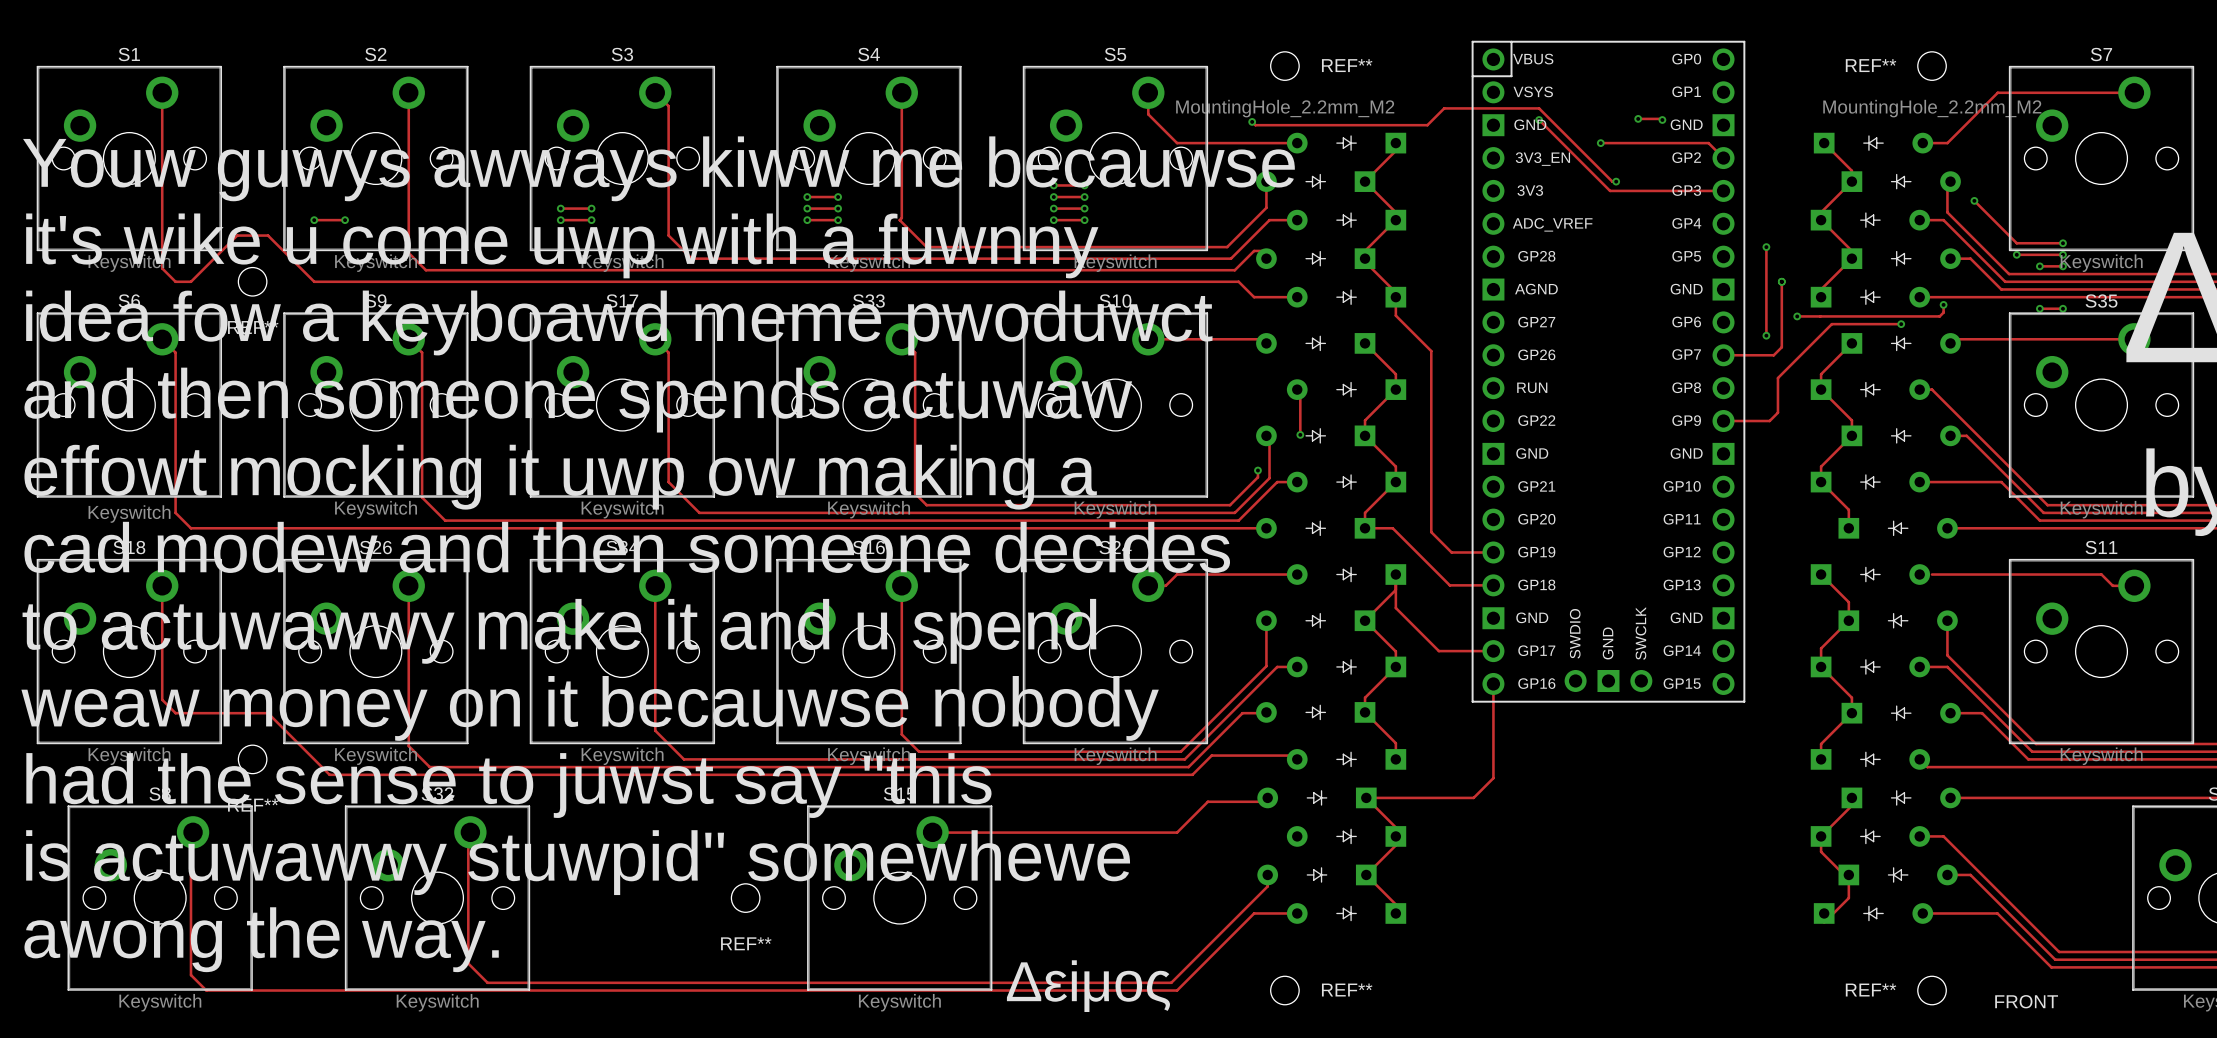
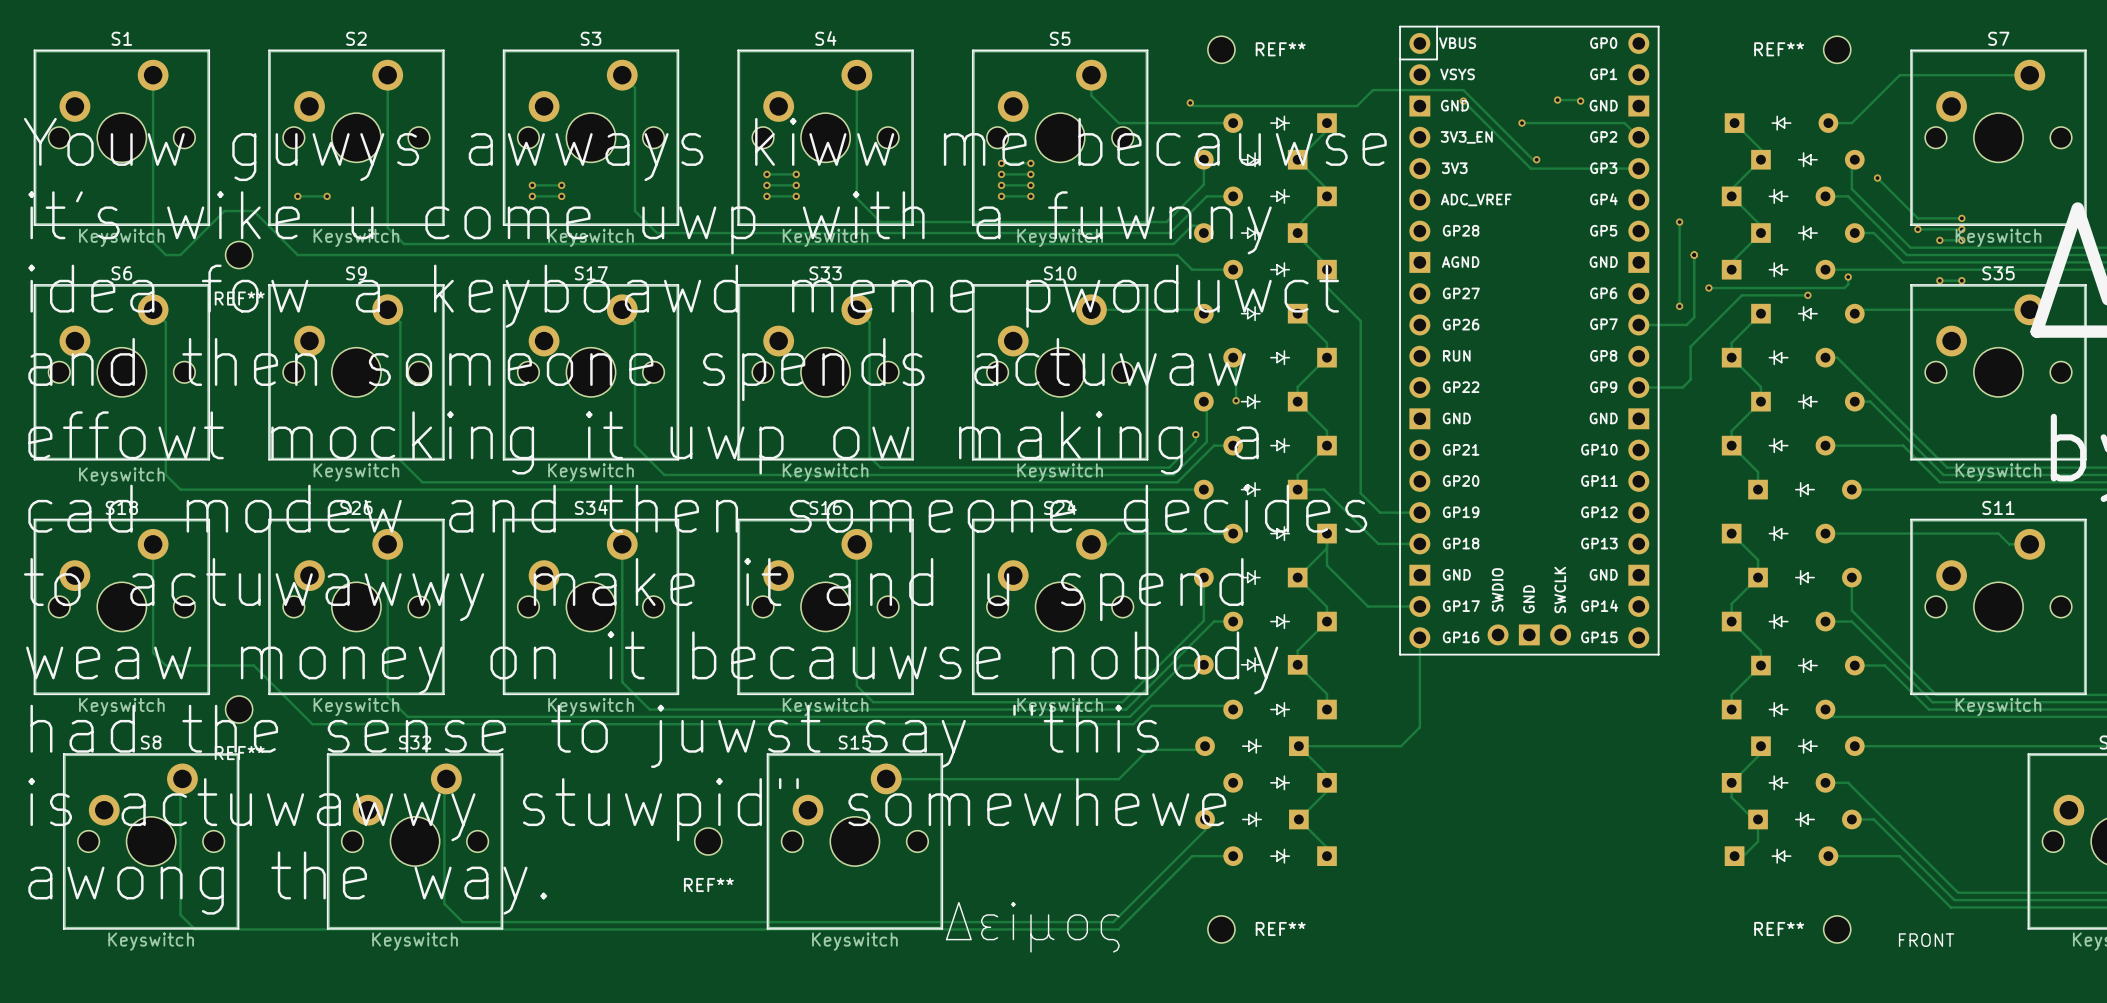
REF** value: MountingHole_2.2mm_M2 (1285, 108) -> none
REF** value: MountingHole_2.2mm_M2 (1932, 108) -> none

